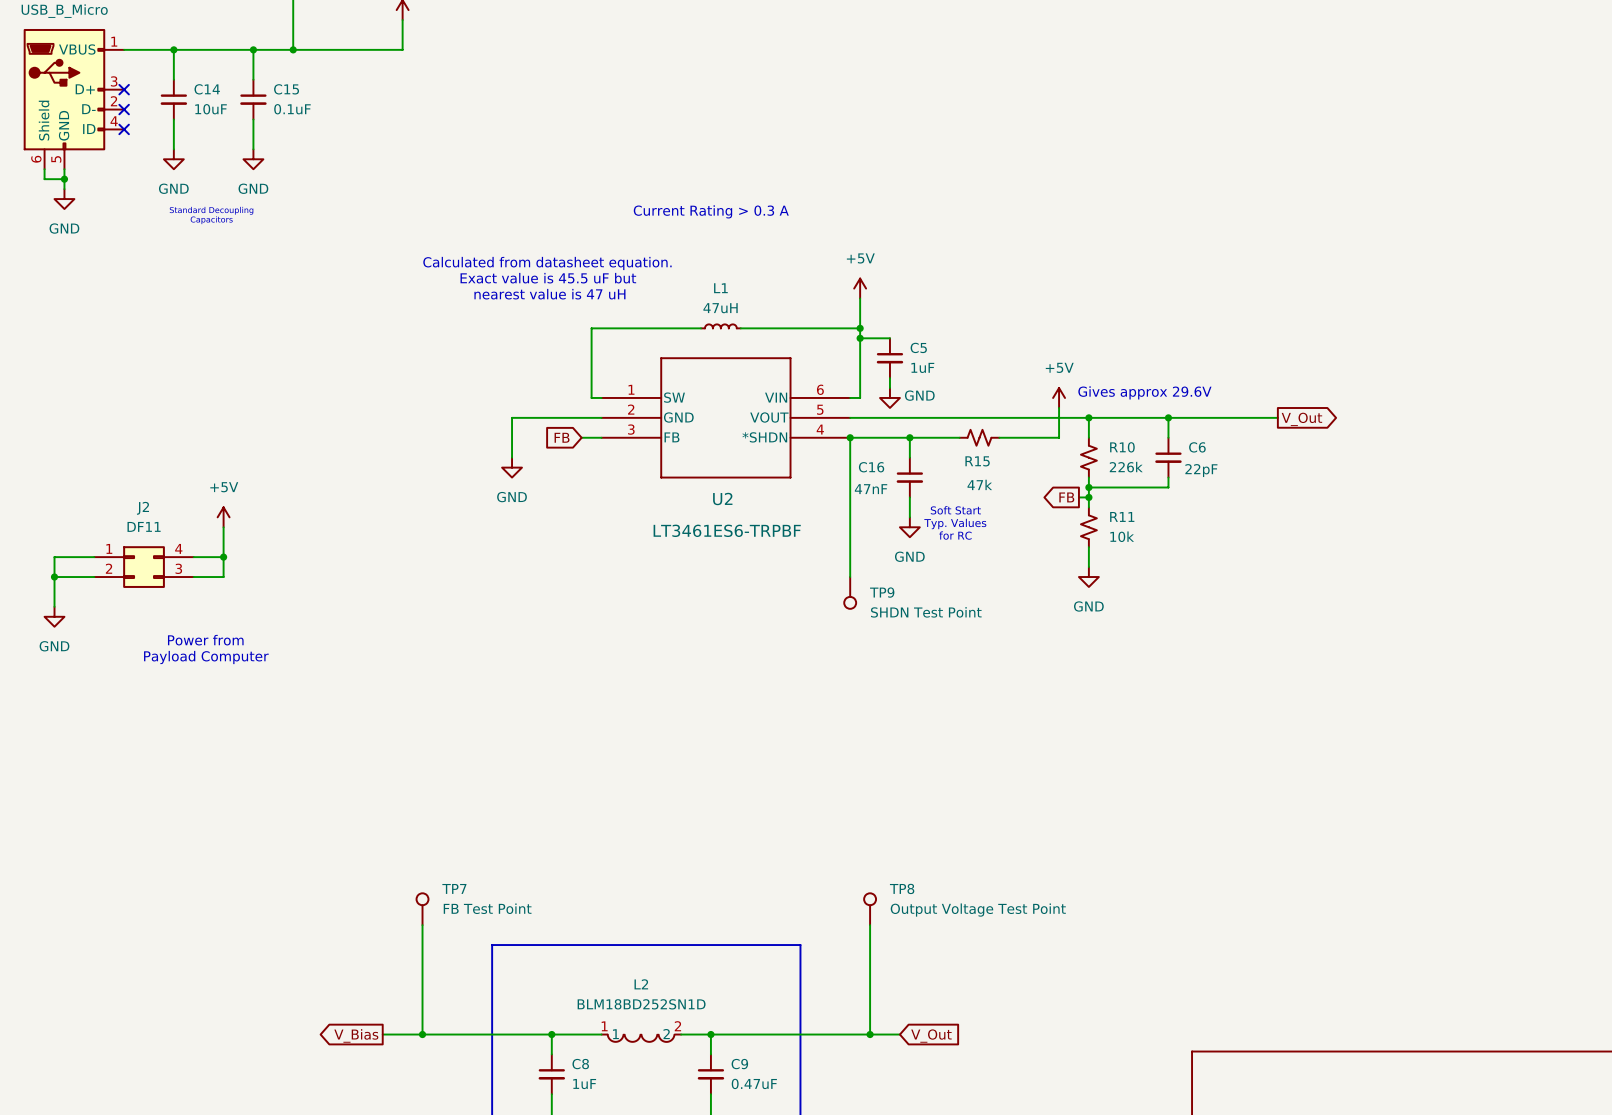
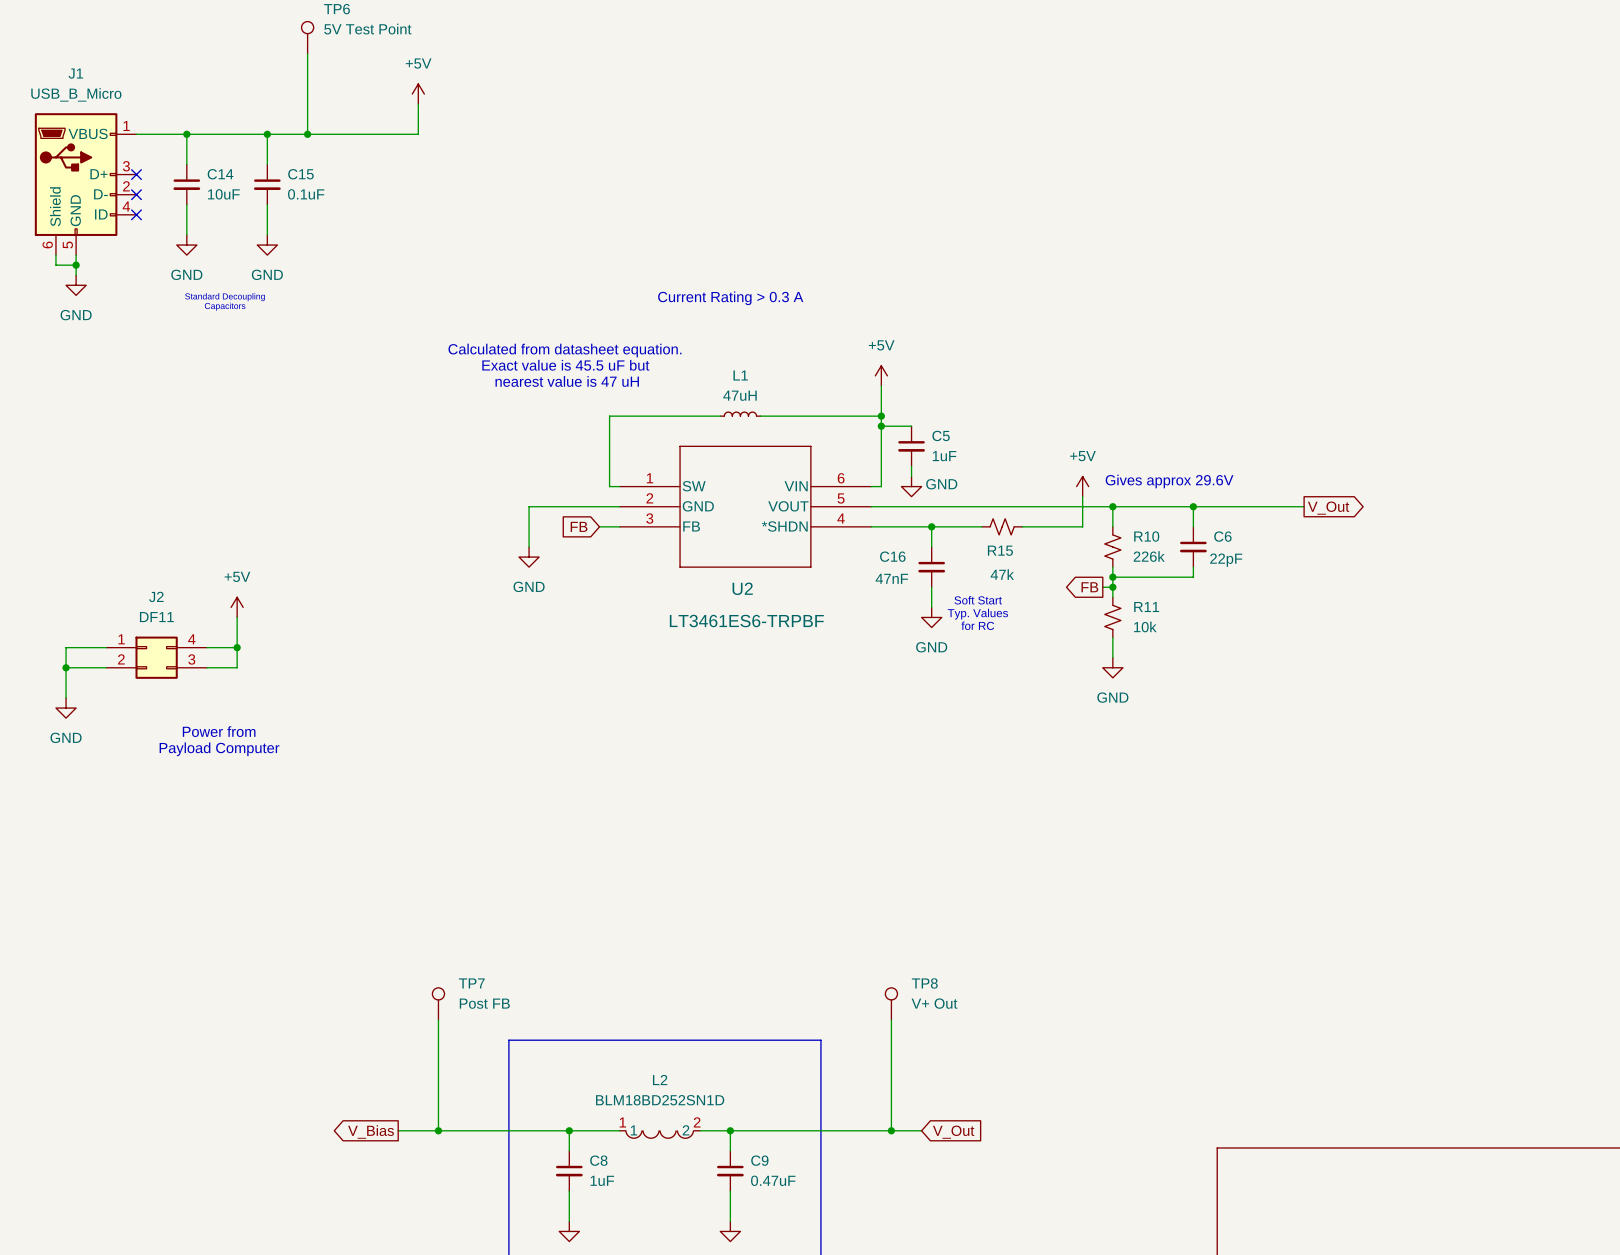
wire: (850, 437) (850, 577) -> none
junction: (850, 437) -> none
TP9: SHDN Test Point (850, 592) -> none
TP7 value: FB Test Point (487, 908) -> Post FB (484, 1003)
TP8 value: Output Voltage Test Point (978, 910) -> V+ Out (934, 1003)

